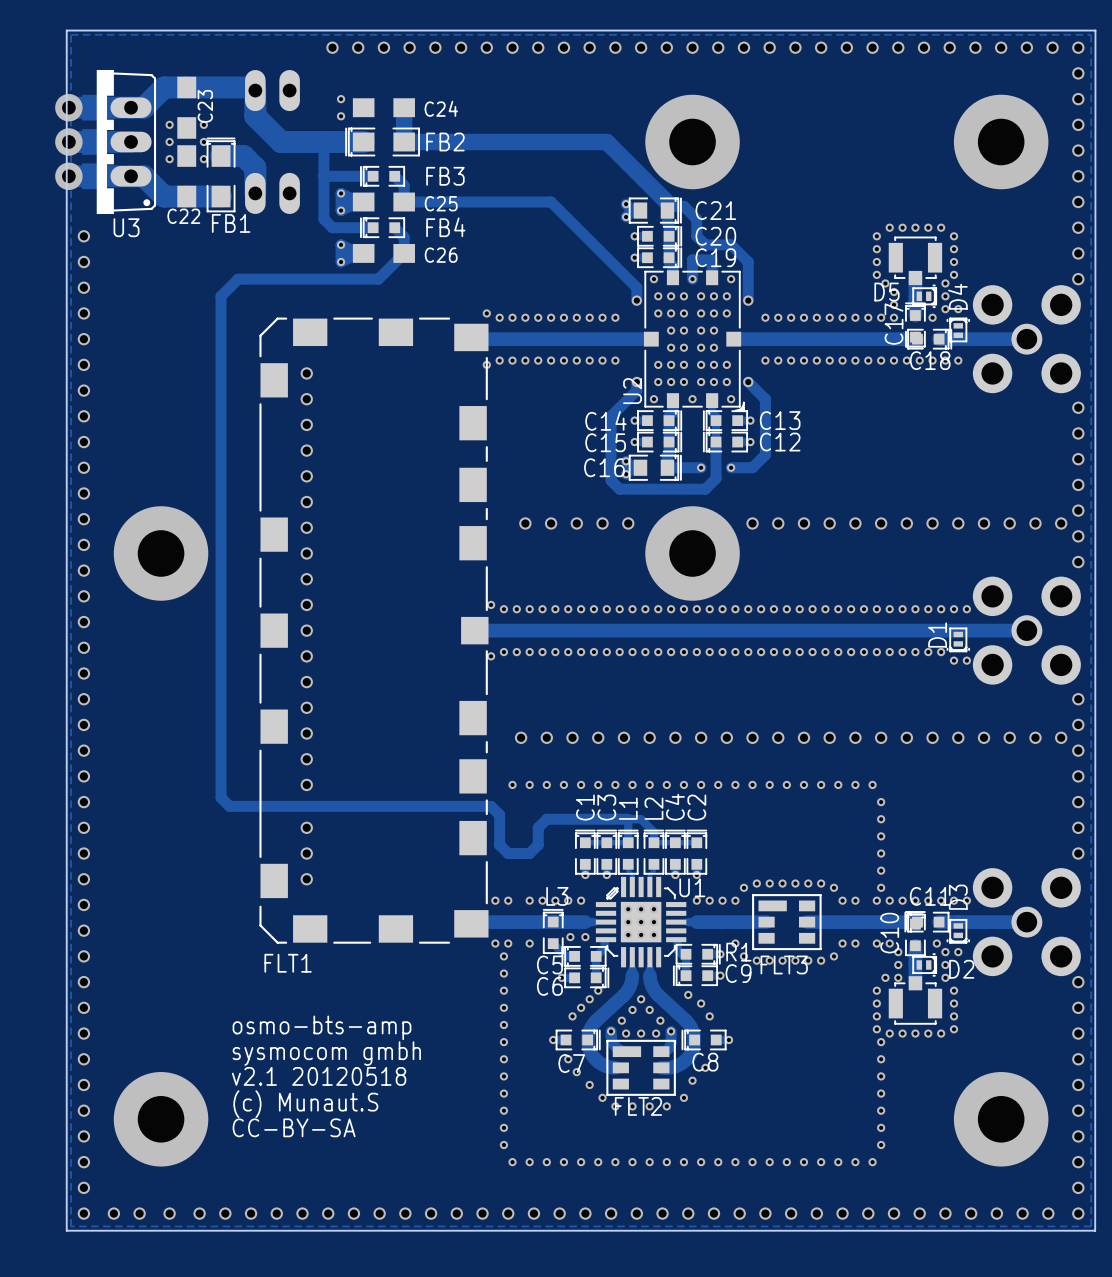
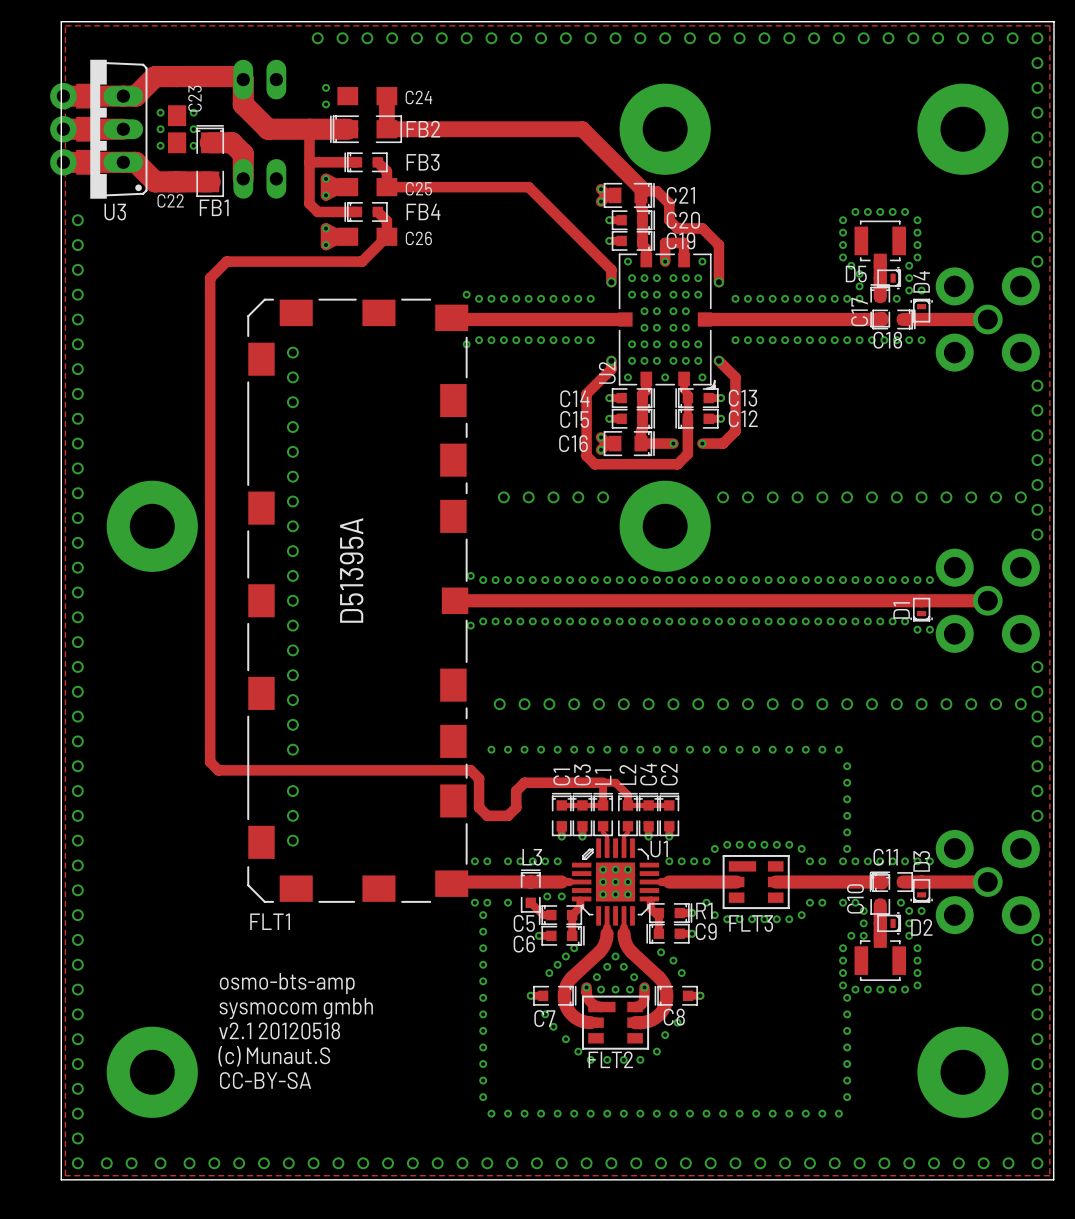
text: none -> D51395A (351, 570)

